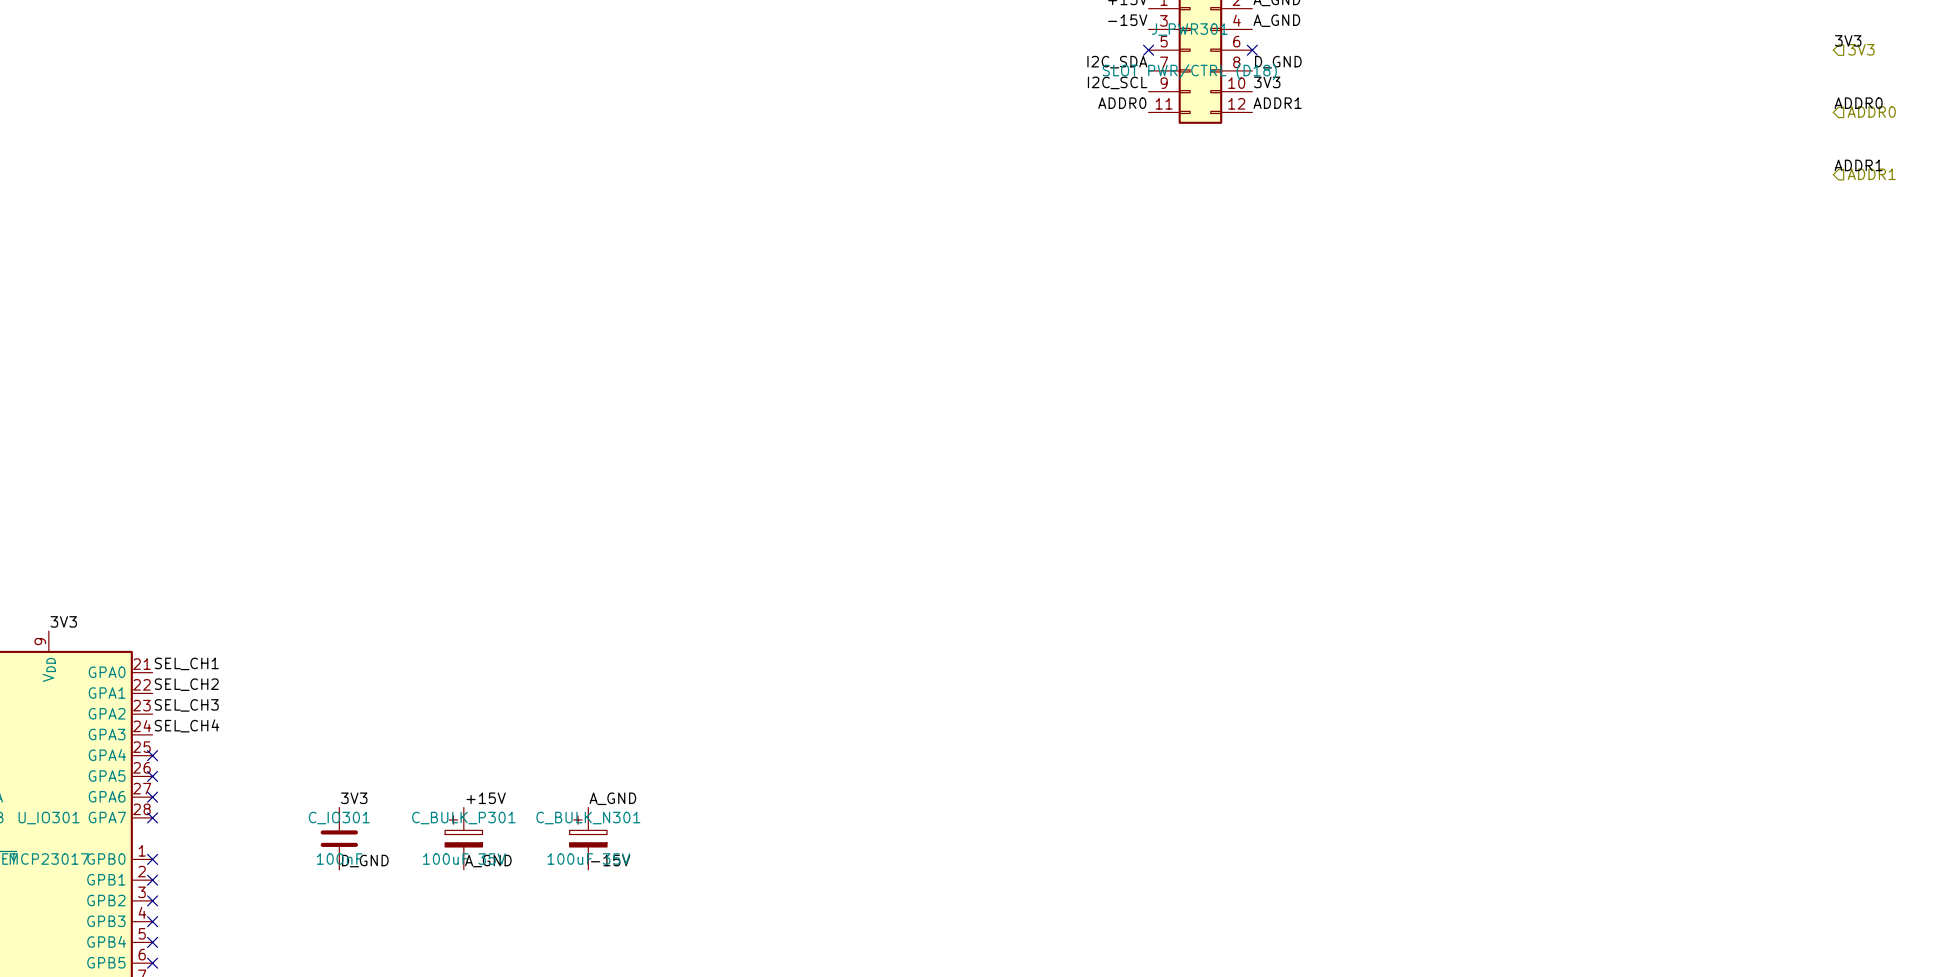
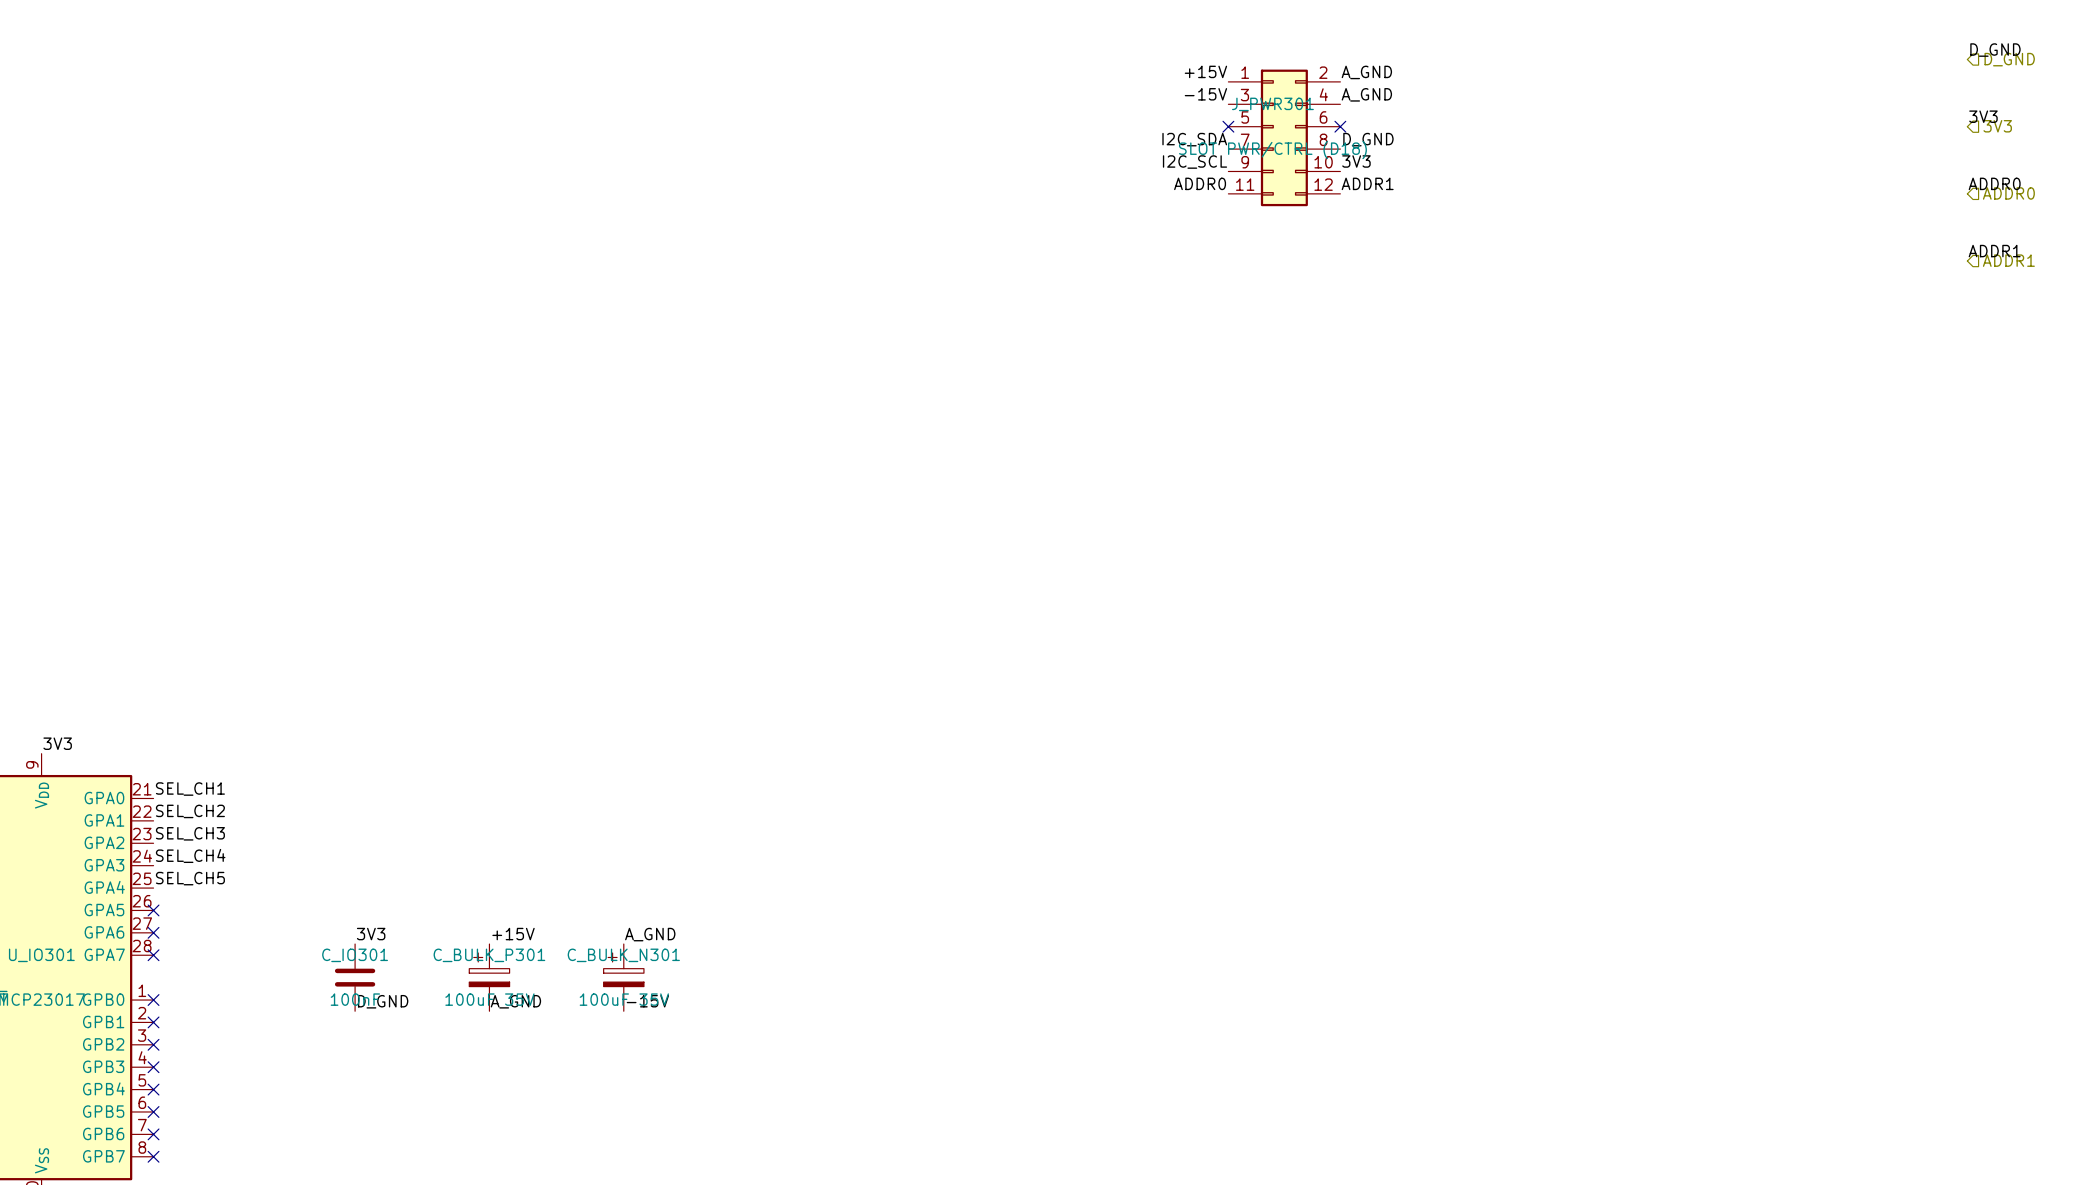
label: none -> SEL_CH5 (190, 878)
no-connect mark: (152, 755) -> none

